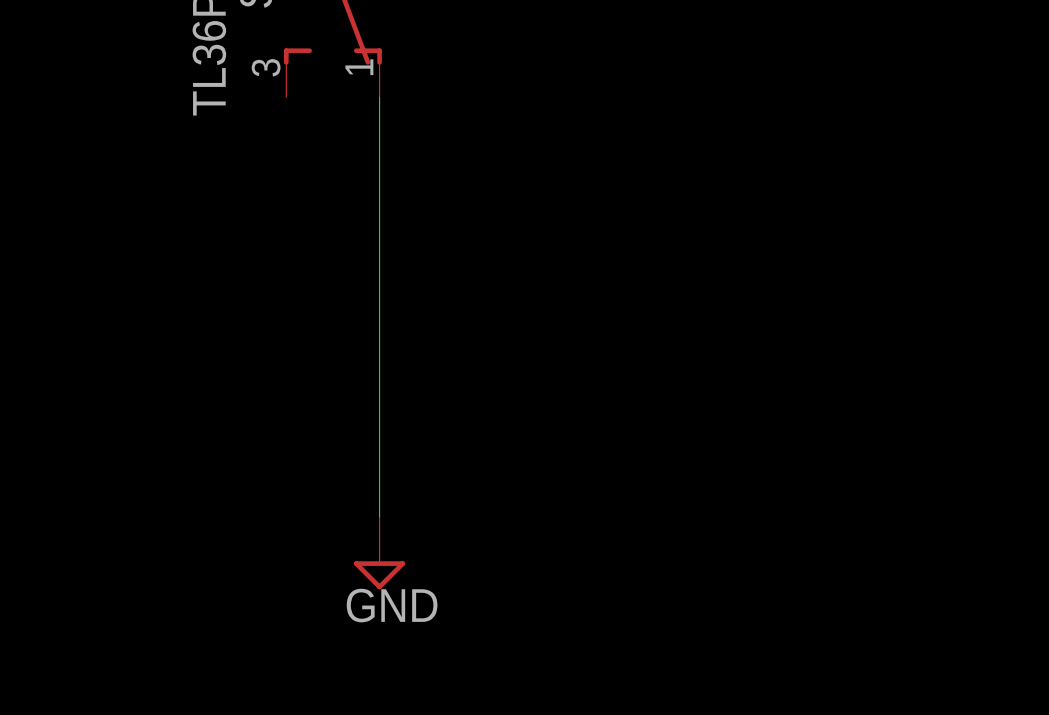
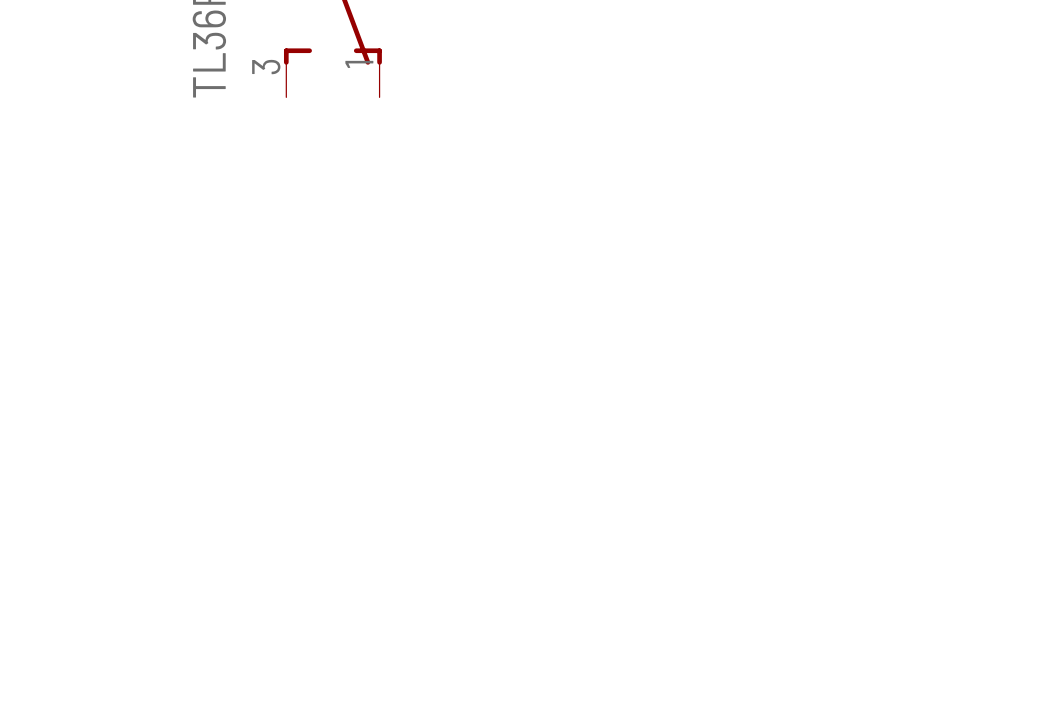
wire: (379, 97) (379, 516) -> none
power symbol: GND (379, 553) -> none

